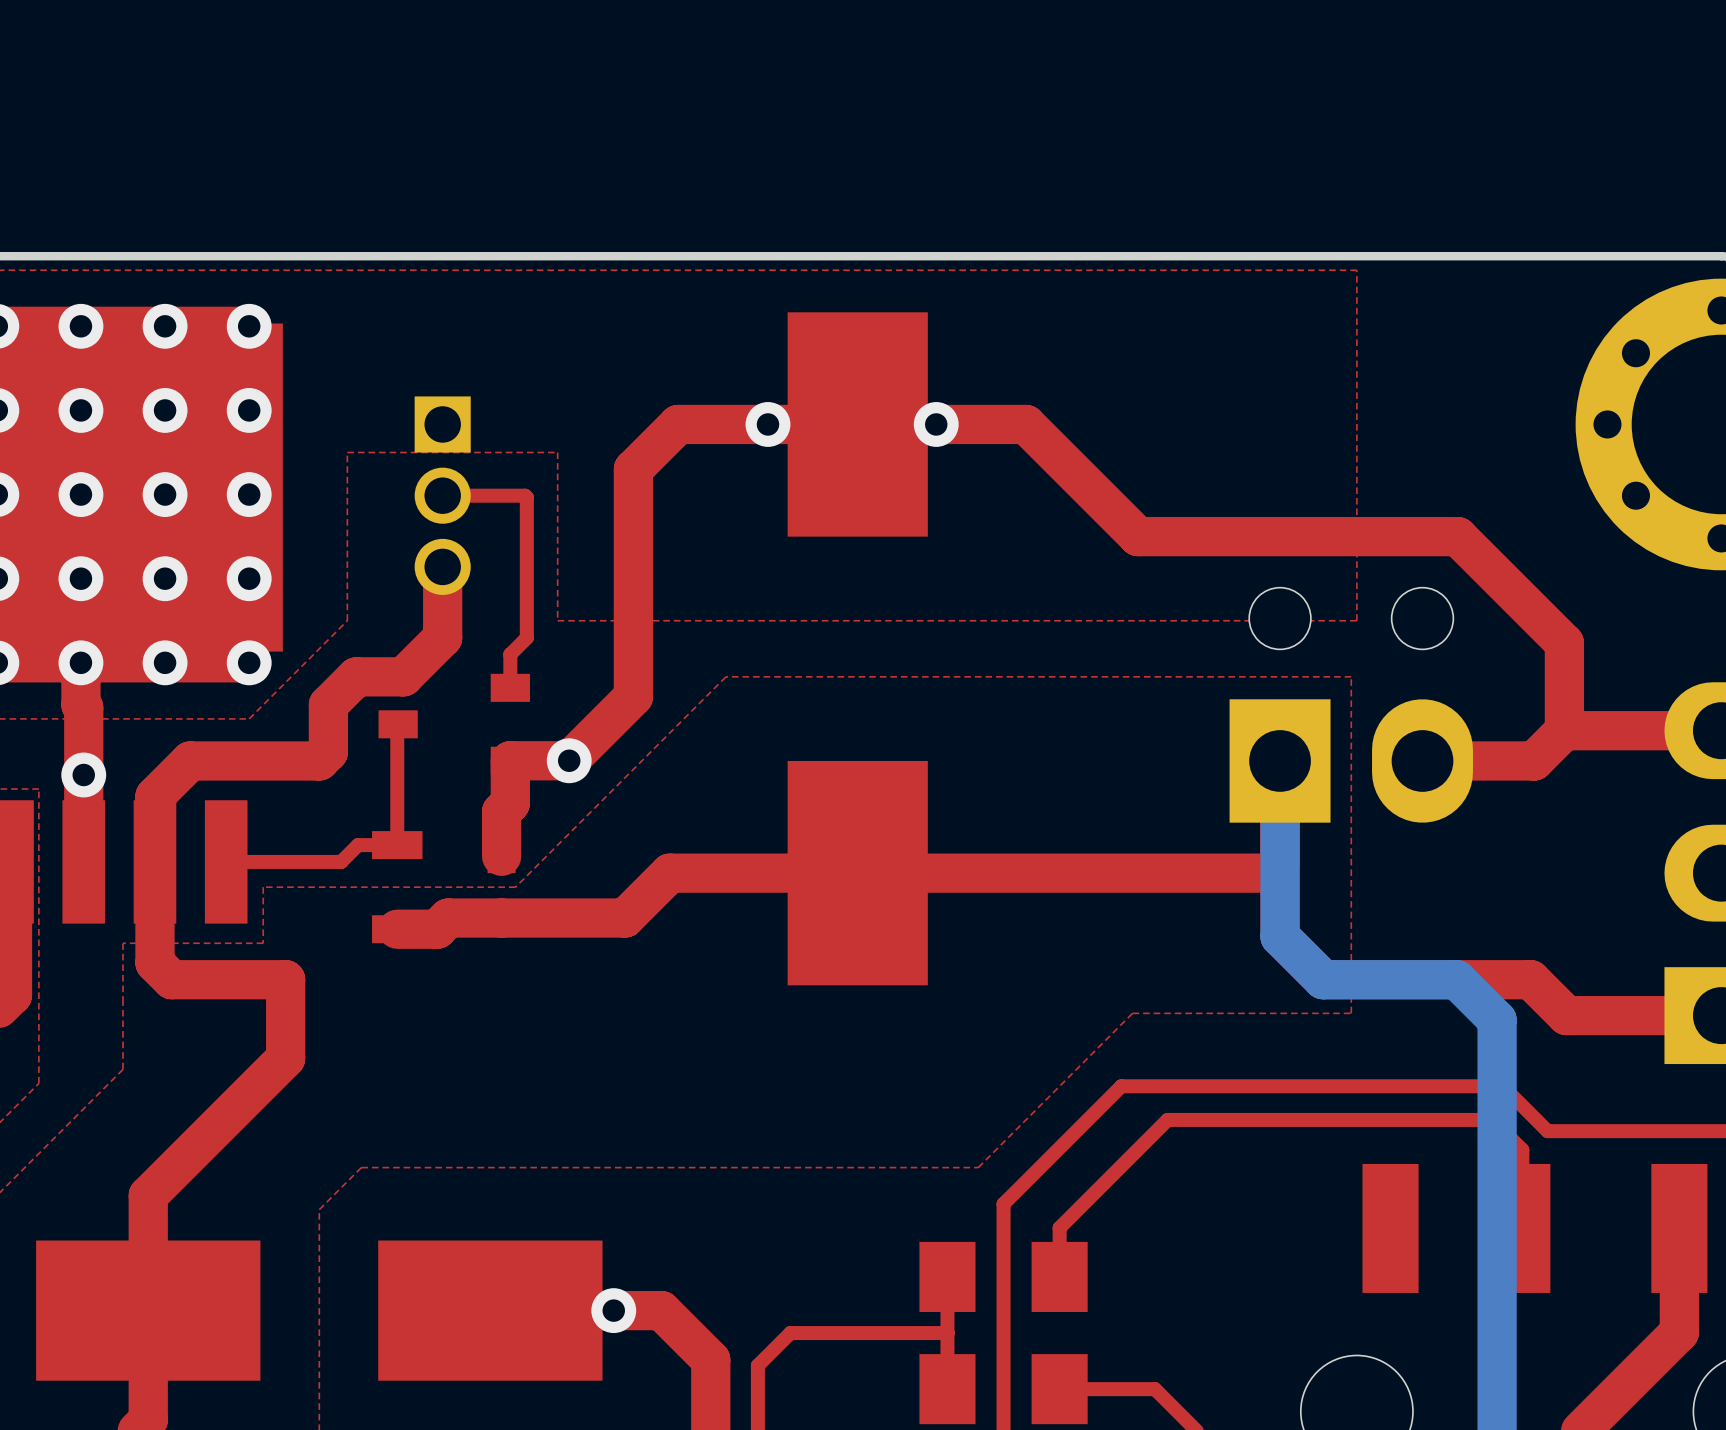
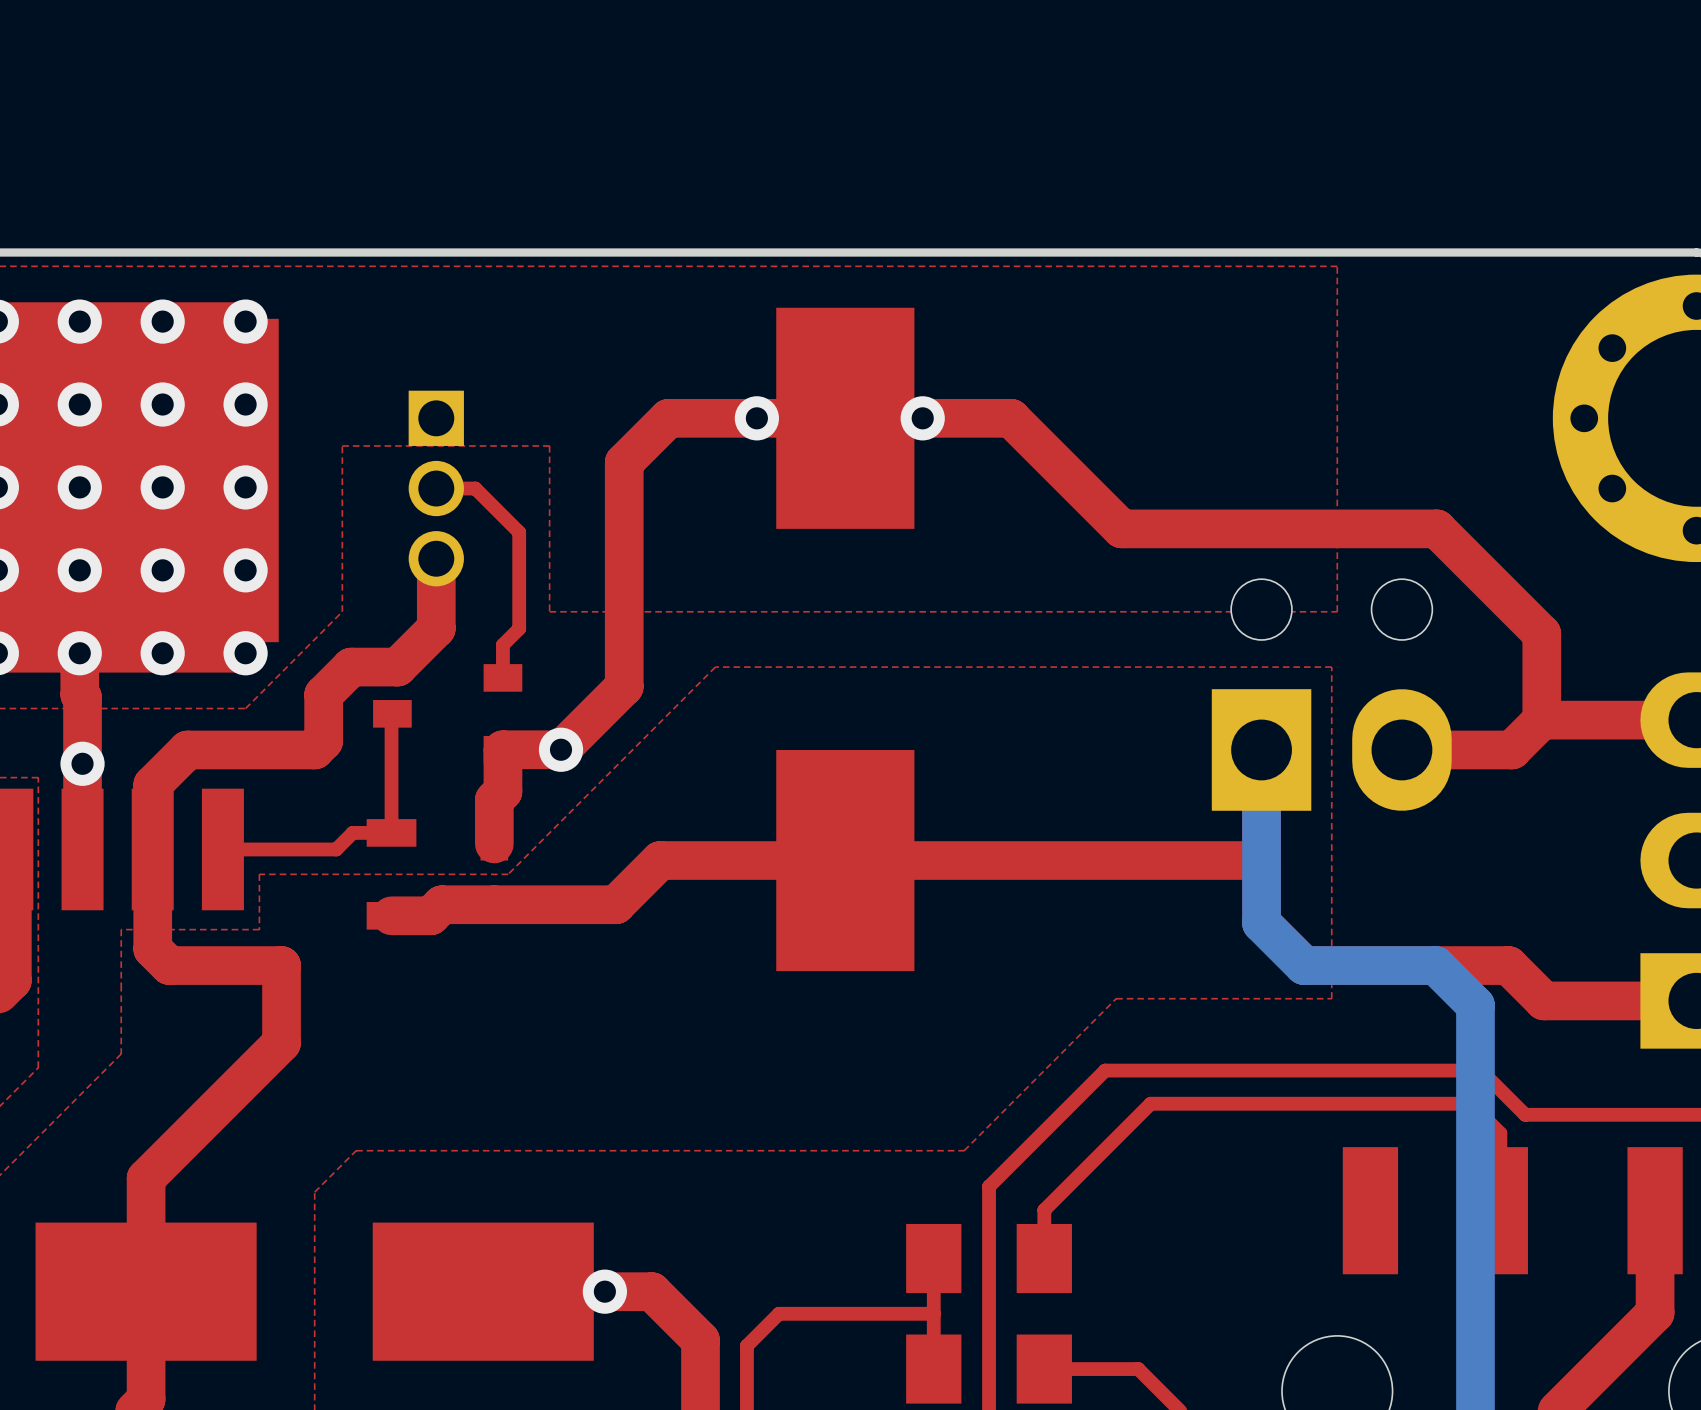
top track: (482, 495) (525, 495) (526, 497) (526, 540) -> (475, 488) (519, 532)

